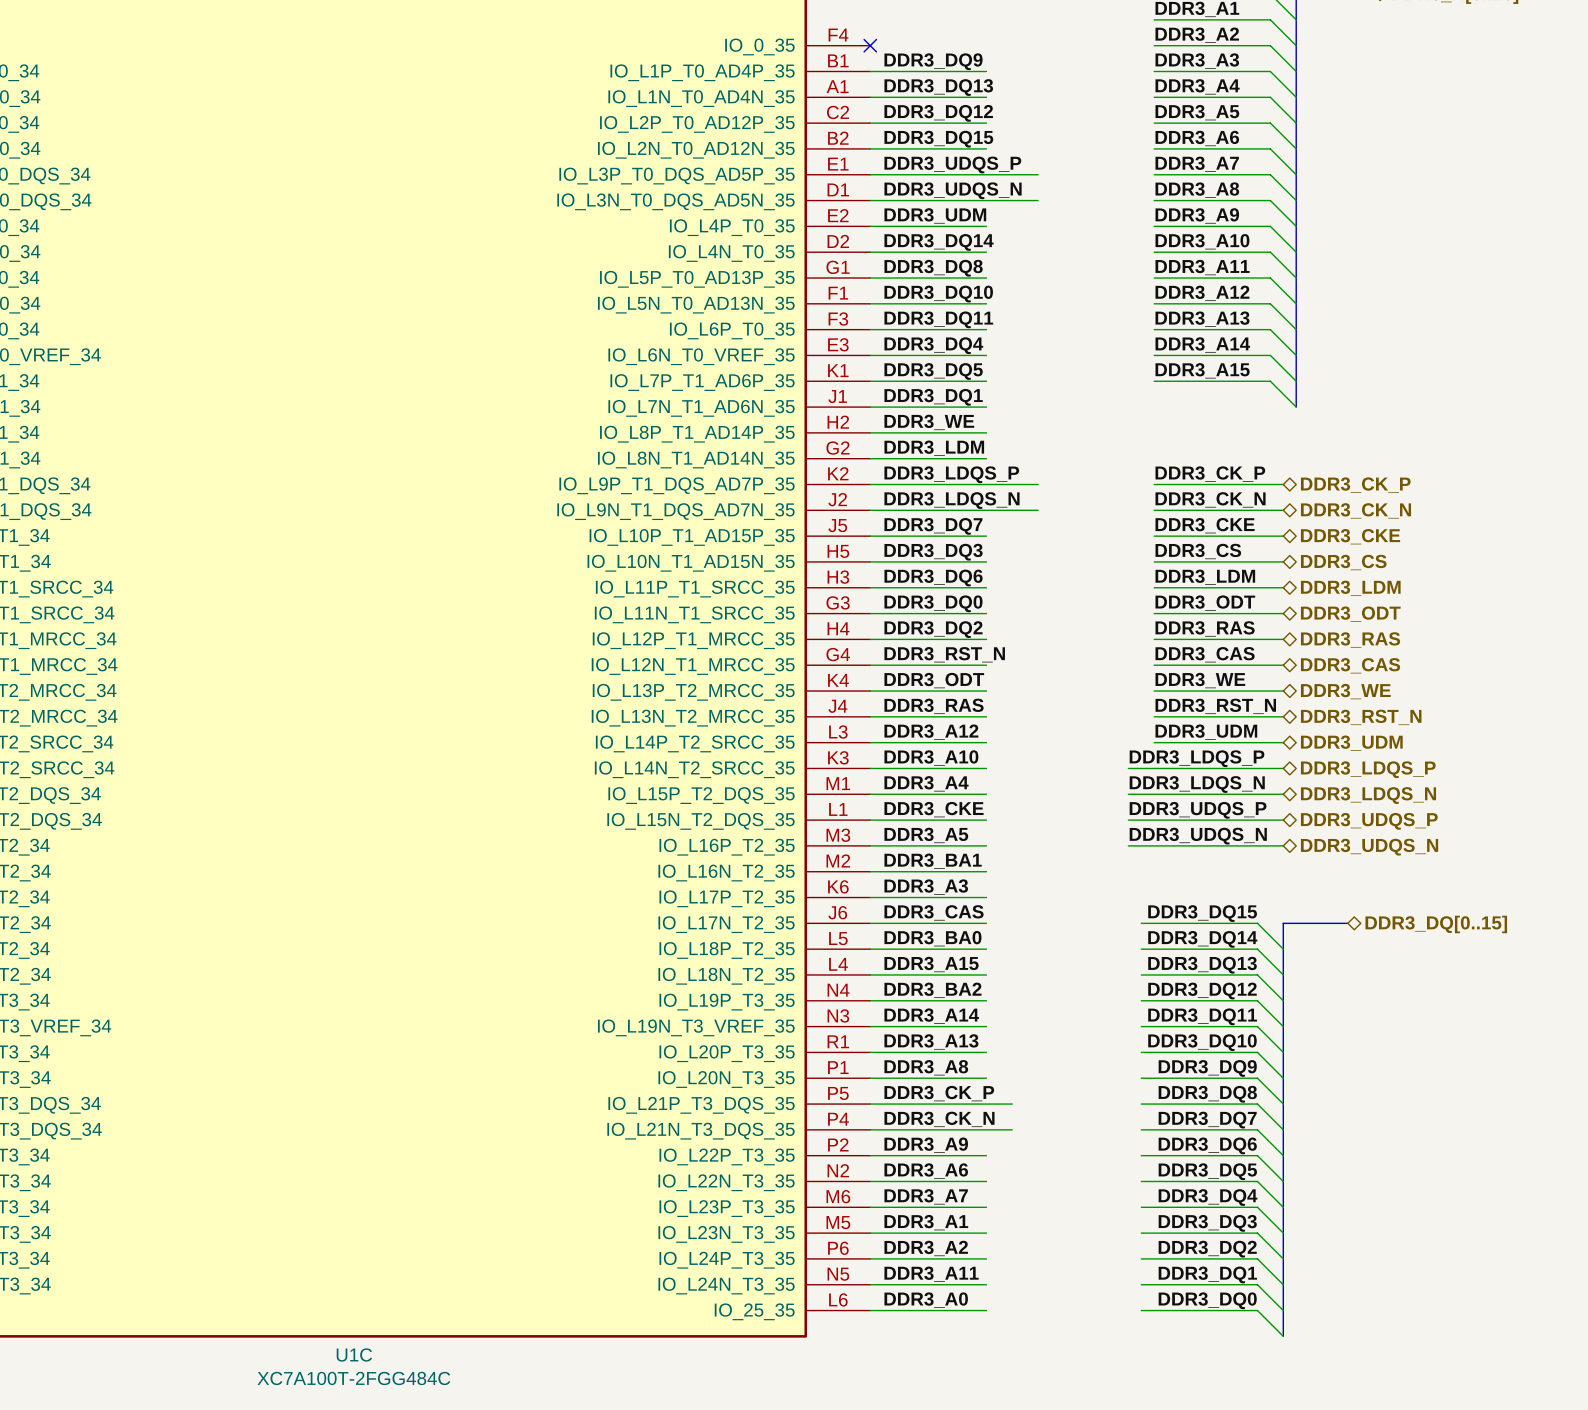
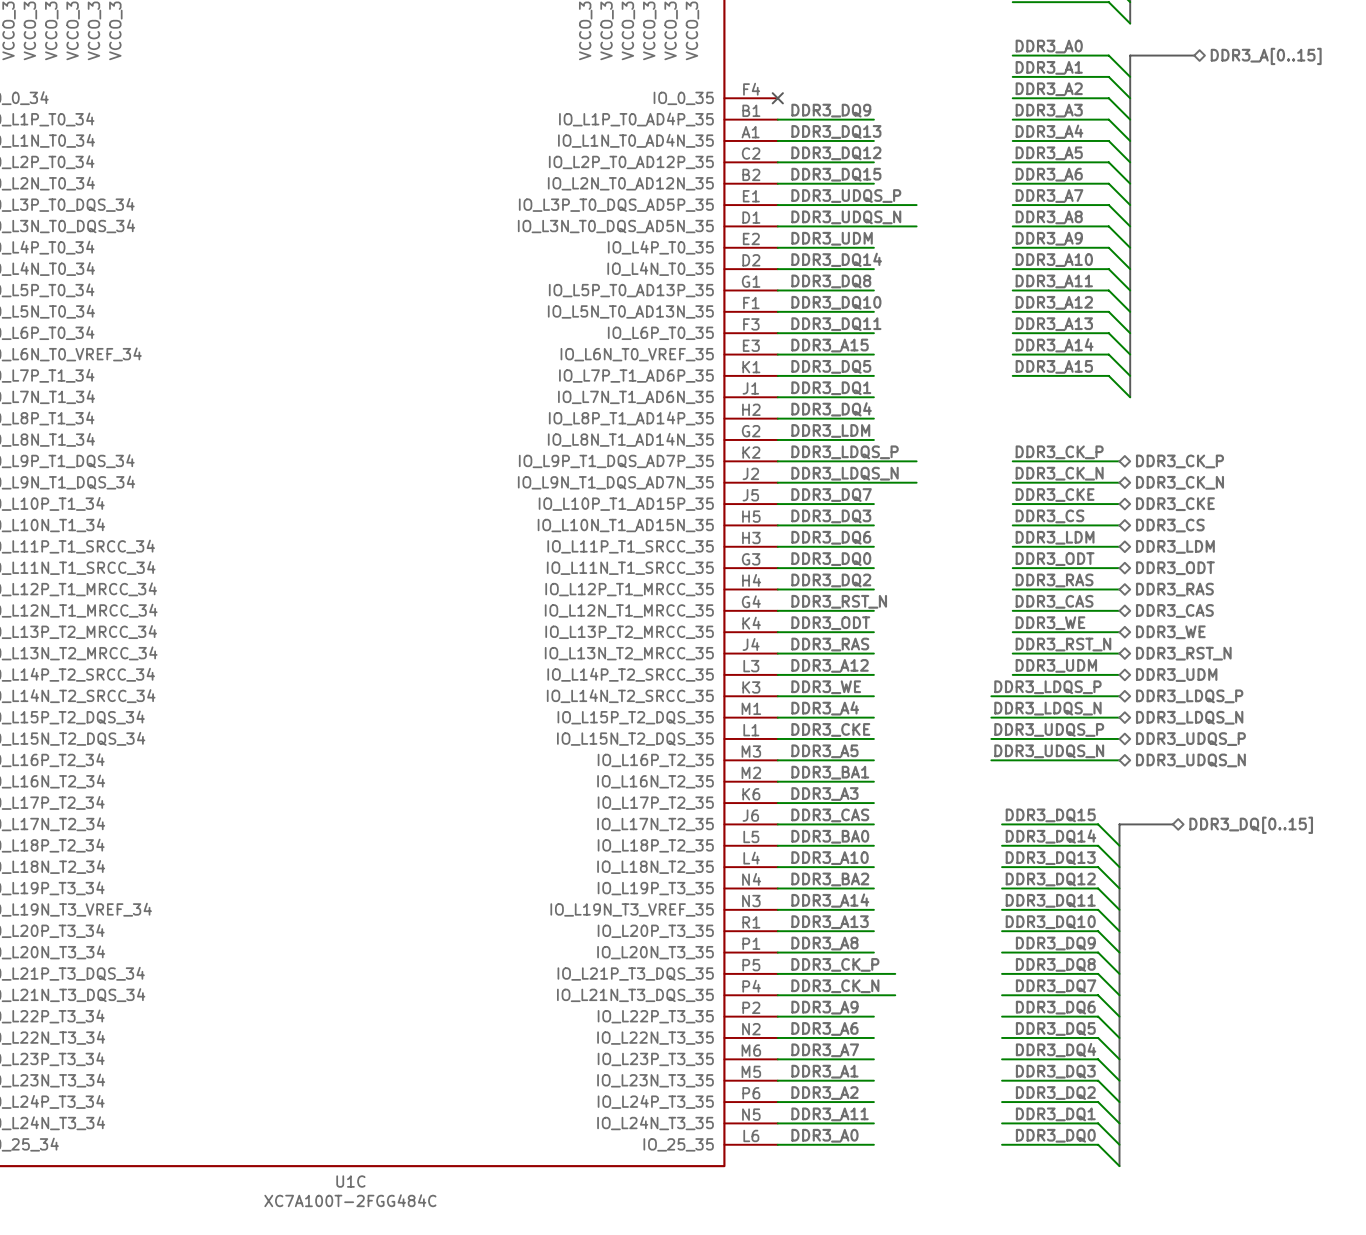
label: DDR3_DQ4 (933, 345) -> DDR3_A15 (830, 345)
label: DDR3_WE (929, 422) -> DDR3_DQ4 (831, 409)
label: DDR3_A10 (931, 757) -> DDR3_WE (826, 687)
label: DDR3_A15 (931, 964) -> DDR3_A10 (830, 858)

